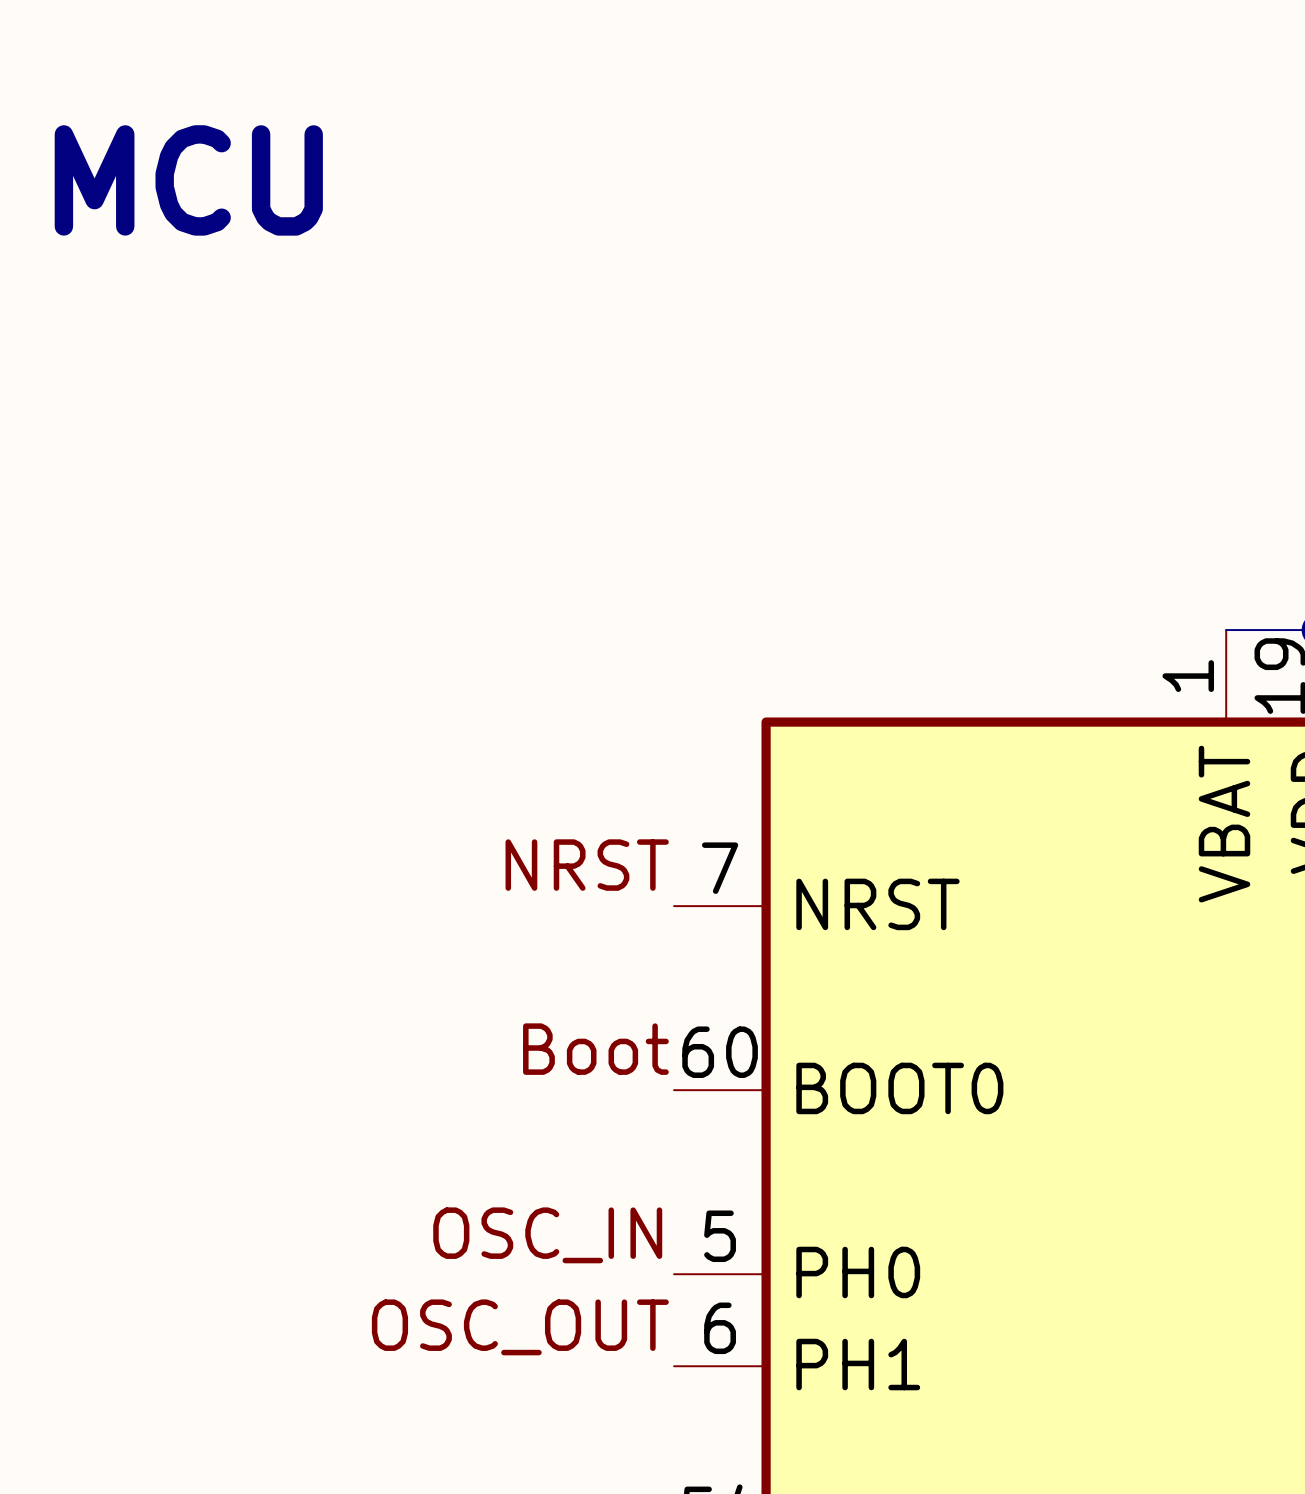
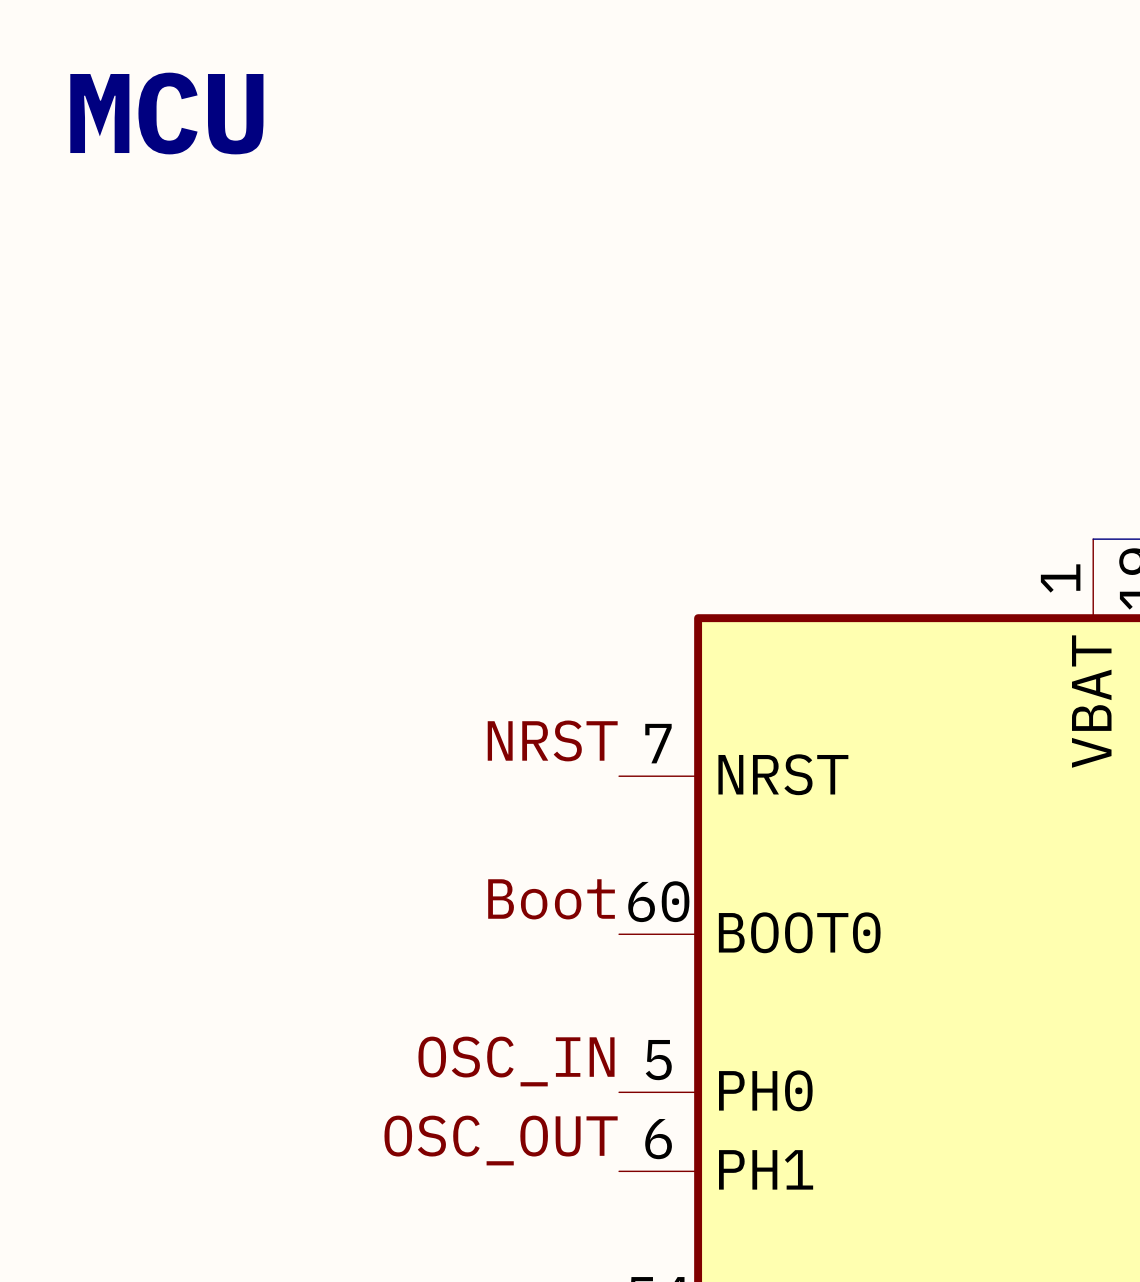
text position: MCU (188, 180) -> MCU (166, 113)

